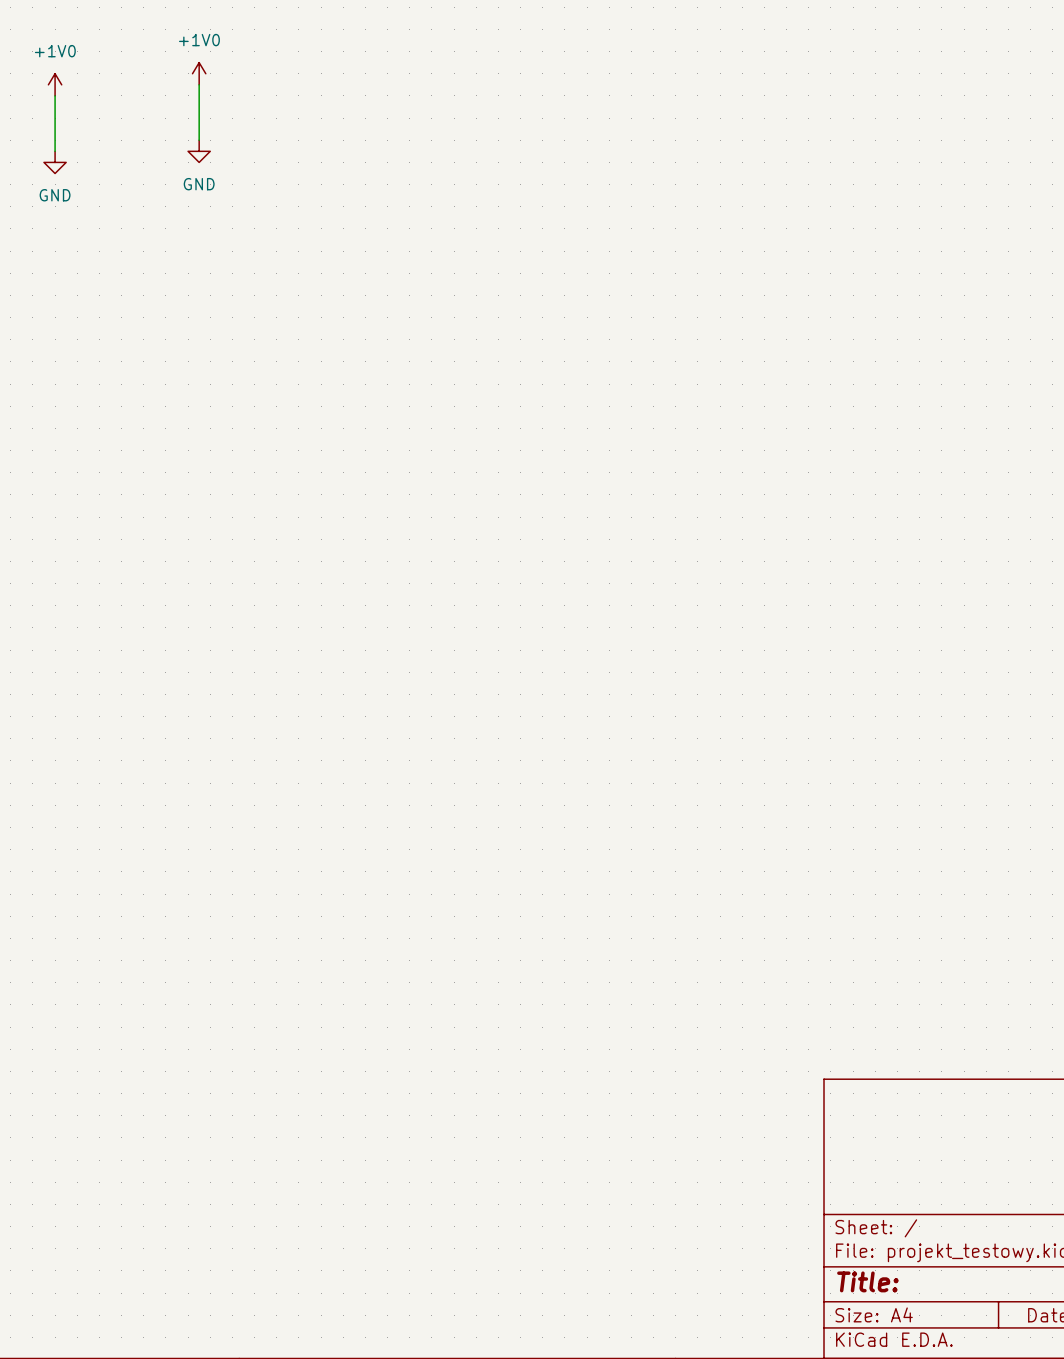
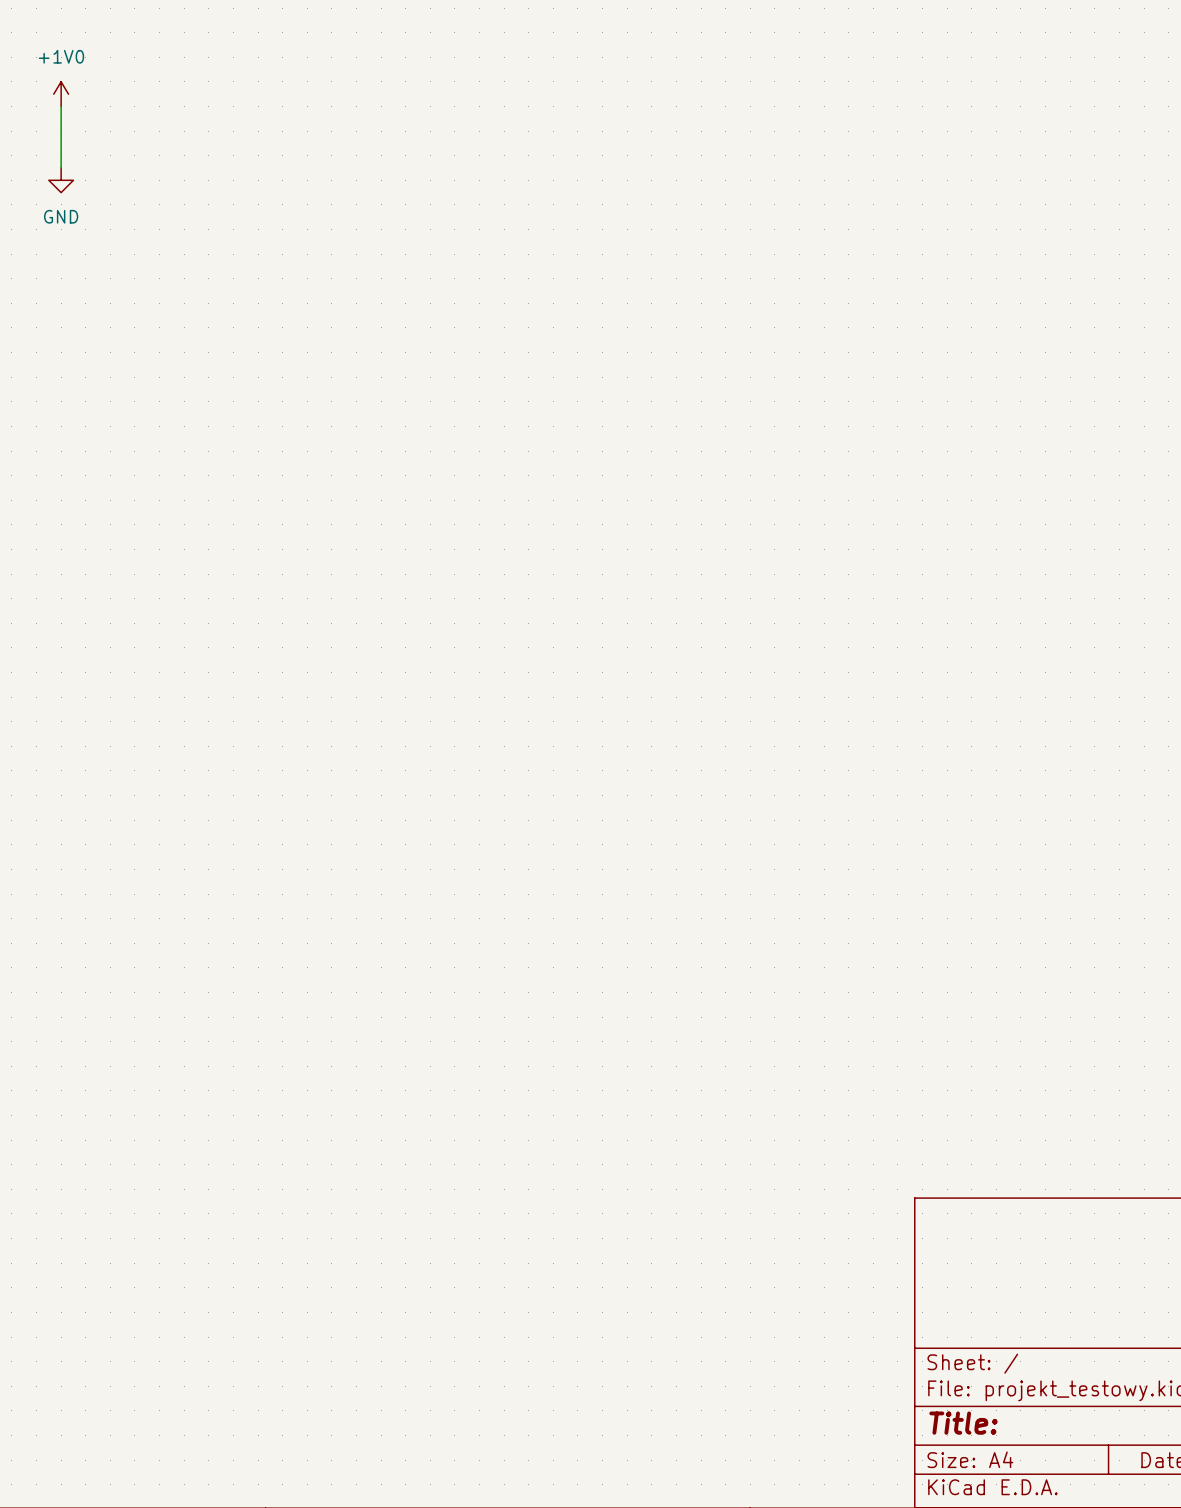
power symbol: +1V0 (199, 73) -> none
wire: (199, 84) (199, 140) -> none
power symbol: GND (199, 151) -> none

